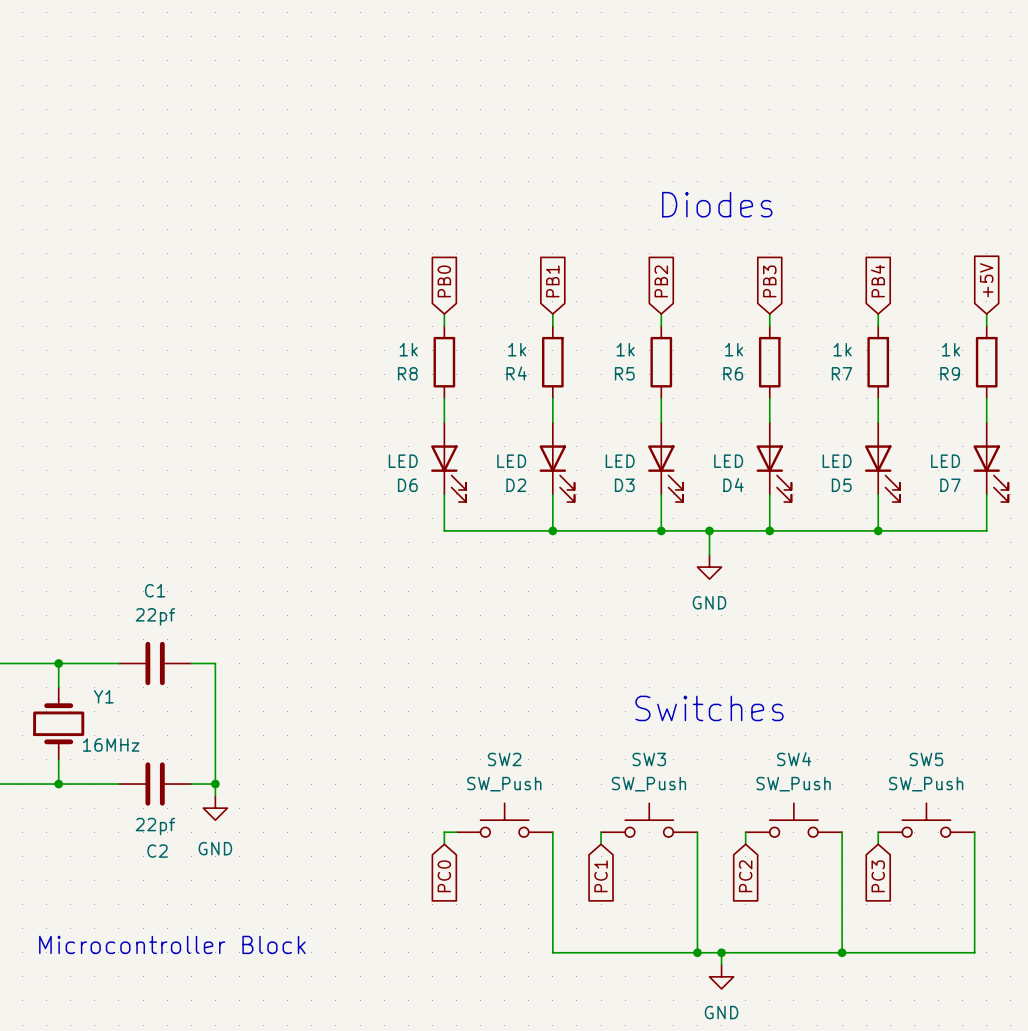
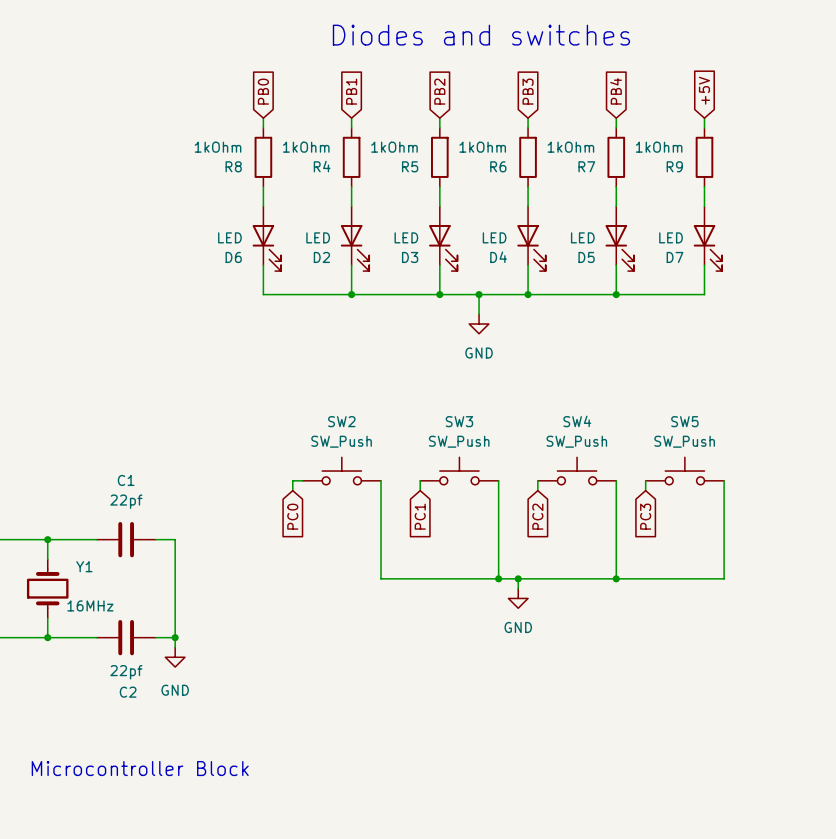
text: none -> Diodes and switches (481, 35)
text: Diodes (717, 204) -> none
global label position: +5V (986, 280) -> +5V (704, 90)
global label position: PB0 (444, 281) -> PB0 (263, 91)
global label position: PB1 (552, 281) -> PB1 (351, 91)
global label position: PB2 (661, 281) -> PB2 (439, 91)
global label position: PB3 (769, 281) -> PB3 (528, 91)
global label position: PB4 (877, 281) -> PB4 (616, 91)
wire: (444, 313) (444, 326) -> (263, 118) (263, 127)
wire: (552, 313) (552, 326) -> (351, 118) (351, 127)
wire: (661, 313) (661, 326) -> (439, 118) (439, 127)
wire: (769, 313) (769, 326) -> (528, 118) (528, 127)
wire: (878, 313) (878, 326) -> (616, 118) (616, 127)
wire: (986, 313) (986, 326) -> (704, 118) (704, 127)
R8 value: 1k (408, 349) -> 1kOhm (218, 147)
R4 value: 1k (517, 349) -> 1kOhm (306, 147)
R5 value: 1k (625, 349) -> 1kOhm (394, 147)
R6 value: 1k (734, 349) -> 1kOhm (482, 147)
R7 value: 1k (842, 349) -> 1kOhm (570, 147)
R9 value: 1k (951, 349) -> 1kOhm (659, 147)
junction: none -> (351, 294)
R8 position: (444, 362) -> (263, 157)
junction: none -> (439, 294)
R4 position: (552, 362) -> (351, 157)
junction: none -> (479, 294)
junction: none -> (528, 294)
R5 position: (661, 362) -> (439, 157)
junction: none -> (616, 294)
R6 position: (769, 362) -> (528, 157)
R7 position: (878, 362) -> (616, 157)
R9 position: (986, 362) -> (704, 157)
wire: (444, 398) (444, 422) -> (263, 186) (263, 206)
wire: (552, 398) (552, 422) -> (351, 186) (351, 206)
power symbol: none -> GND (479, 323)
wire: (661, 398) (661, 422) -> (439, 186) (439, 206)
wire: (769, 398) (769, 422) -> (528, 186) (528, 206)
wire: (878, 398) (878, 422) -> (616, 186) (616, 206)
wire: (986, 398) (986, 422) -> (704, 186) (704, 206)
D6 position: (448, 462) -> (266, 238)
D2 position: (557, 462) -> (355, 238)
D3 position: (665, 462) -> (443, 238)
D4 position: (773, 462) -> (531, 238)
D5 position: (882, 462) -> (619, 238)
D7 position: (990, 462) -> (707, 238)
wire: (444, 494) (444, 530) (986, 530) (986, 494) -> (263, 265) (263, 294) (704, 294) (704, 265)
wire: (552, 494) (552, 530) -> (351, 265) (351, 294)
wire: (661, 494) (661, 530) -> (439, 265) (439, 294)
wire: (769, 494) (769, 530) -> (528, 265) (528, 294)
wire: (878, 494) (878, 530) -> (616, 265) (616, 294)
junction: (552, 530) -> none
junction: (661, 530) -> none
wire: (709, 530) (709, 555) -> (479, 294) (479, 314)
junction: (709, 530) -> none
junction: (769, 530) -> none
junction: (878, 530) -> none
power symbol: GND (709, 567) -> none
wire: none -> (302, 480) (292, 480) (292, 490)
wire: none -> (381, 480) (381, 578) (724, 578) (724, 480)
wire: none -> (420, 480) (420, 490)
wire: none -> (498, 480) (498, 578)
wire: none -> (537, 480) (537, 490)
wire: none -> (616, 480) (616, 578)
wire: none -> (645, 480) (645, 490)
global label: none -> PC0 (292, 516)
global label: none -> PC1 (420, 516)
global label: none -> PC2 (537, 516)
global label: none -> PC3 (645, 516)
text: Switches (709, 708) -> none
junction: none -> (498, 578)
junction: none -> (518, 578)
junction: none -> (616, 578)
power symbol: none -> GND (518, 598)
SW2 position: (504, 820) -> (341, 471)
SW3 position: (649, 820) -> (459, 471)
SW4 position: (793, 820) -> (577, 471)
SW5 position: (926, 820) -> (684, 471)
wire: (456, 832) (444, 832) (444, 844) -> none
wire: (552, 832) (552, 952) (974, 952) (974, 832) -> none
wire: (601, 832) (601, 844) -> (518, 578) (518, 588)
wire: (697, 832) (697, 952) -> none
wire: (745, 832) (745, 844) -> none
wire: (842, 832) (842, 952) -> none
wire: (878, 832) (878, 844) -> none
global label: PC0 (444, 876) -> none
global label: PC1 (601, 876) -> none
global label: PC2 (745, 876) -> none
global label: PC3 (878, 876) -> none
junction: (697, 952) -> none
wire: (721, 952) (721, 964) -> none
junction: (721, 952) -> none
junction: (842, 952) -> none
power symbol: GND (721, 976) -> none

